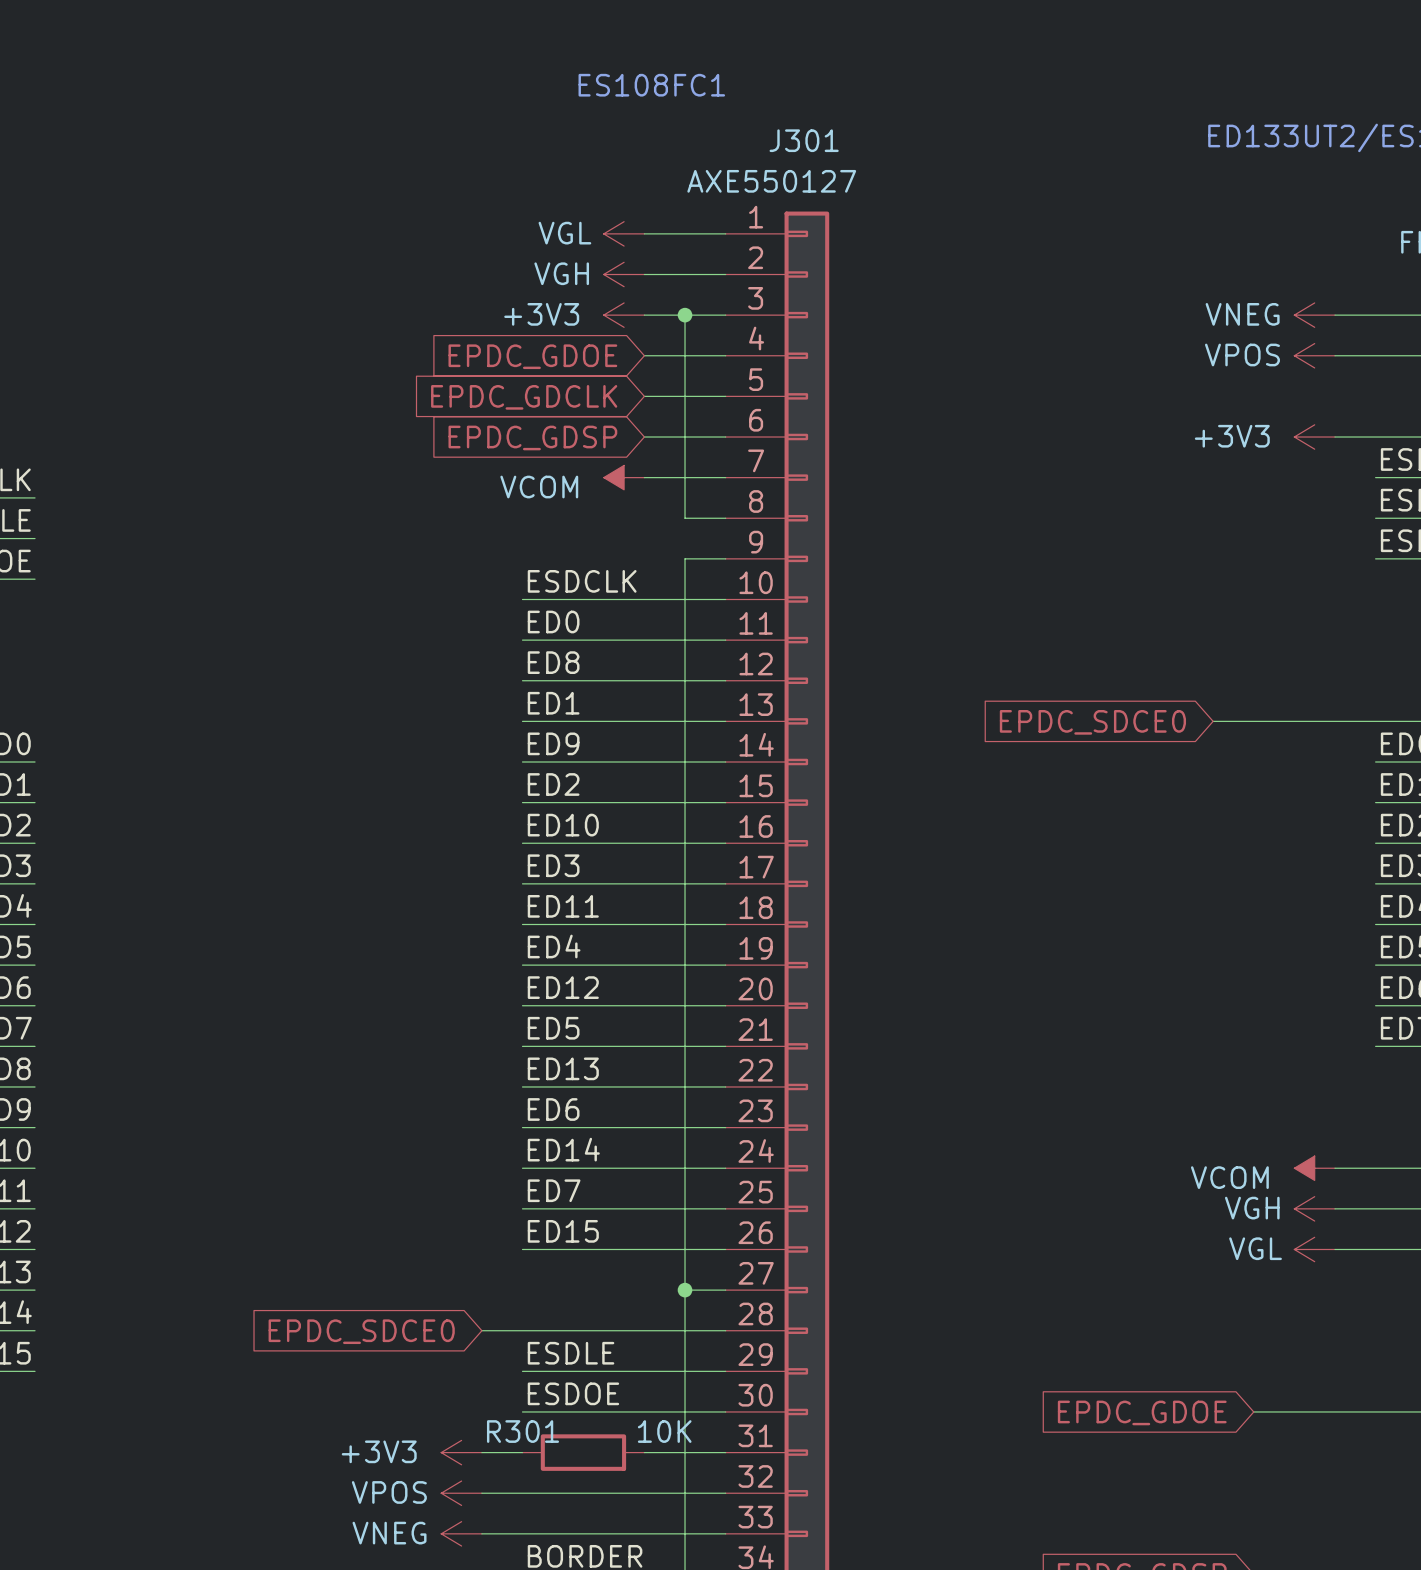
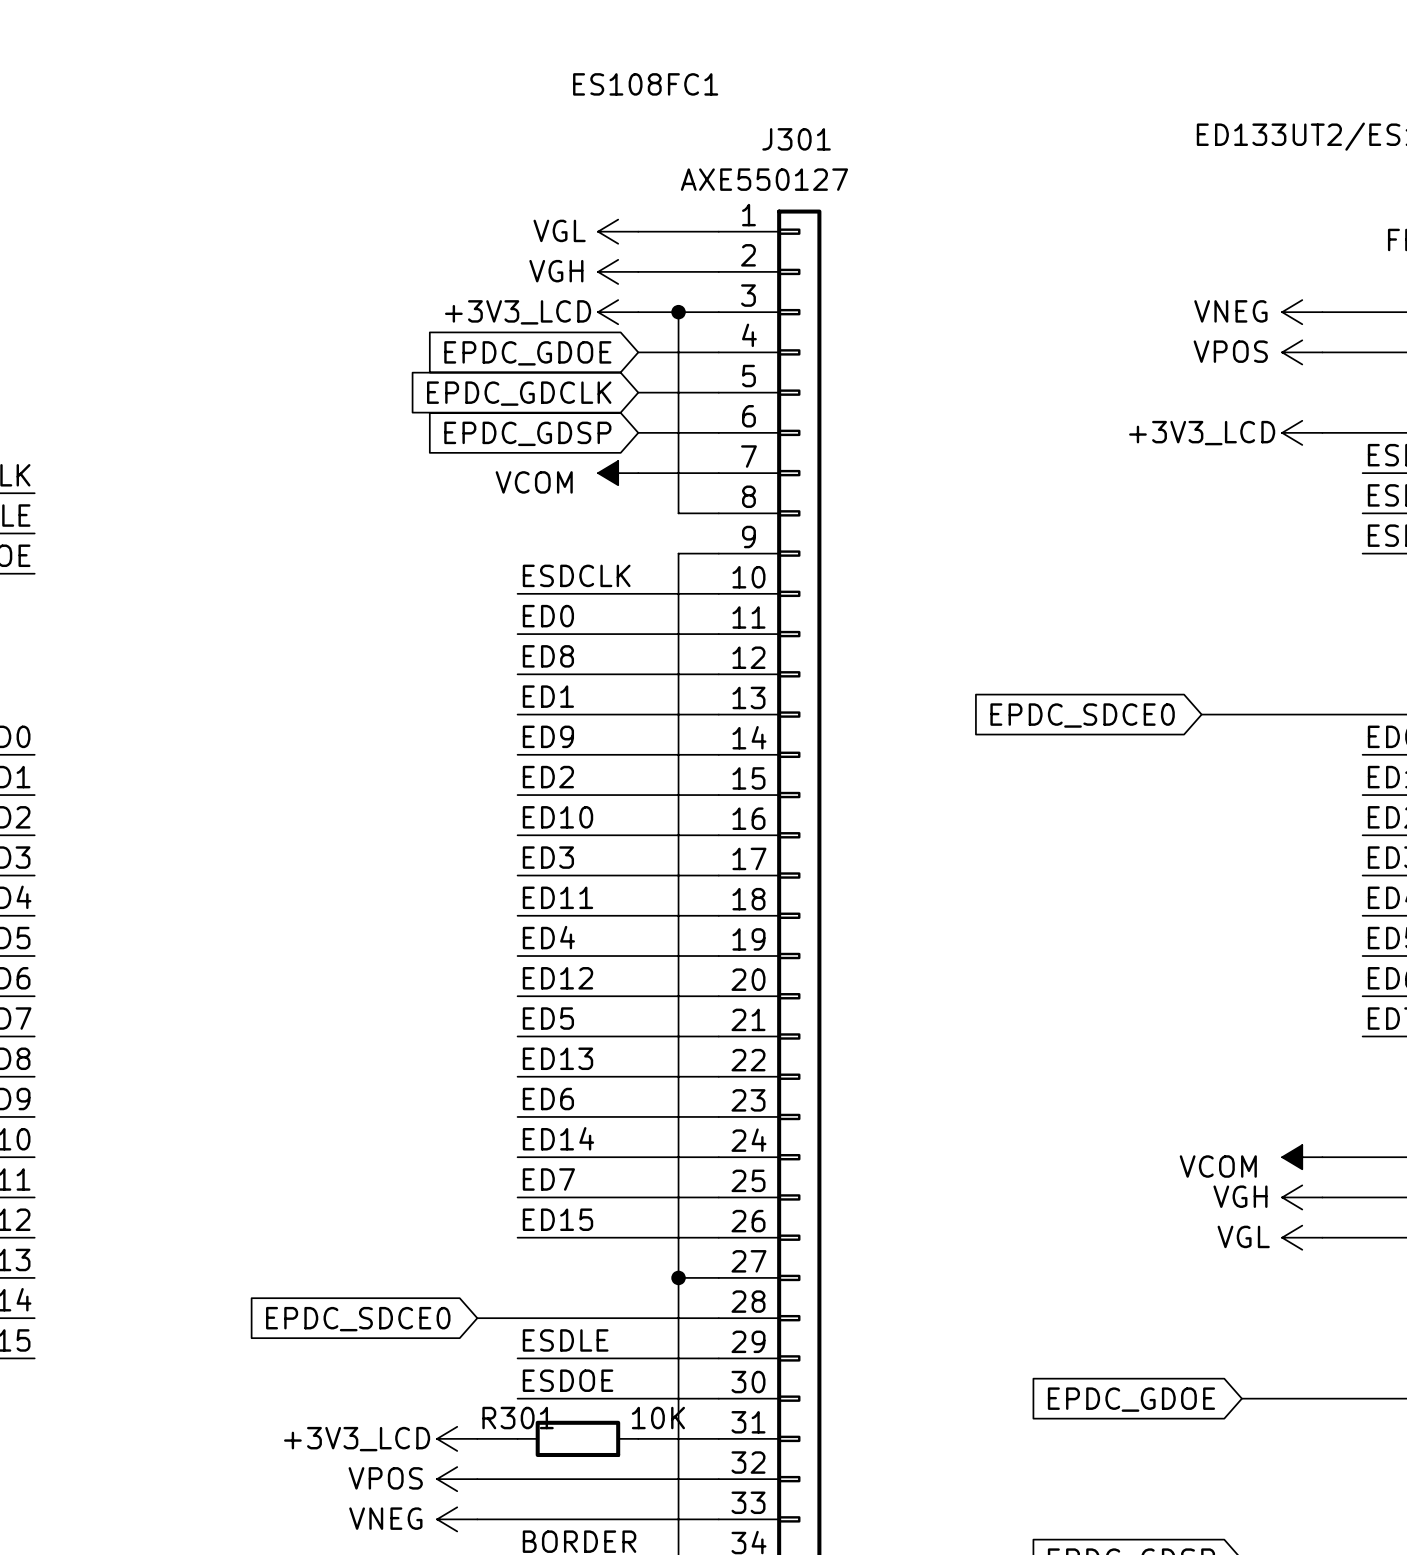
power symbol: +3V3 (624, 315) -> +3V3_LCD (618, 312)
power symbol: +3V3 (1314, 437) -> +3V3_LCD (1302, 432)
power symbol: +3V3 (461, 1452) -> +3V3_LCD (457, 1438)

